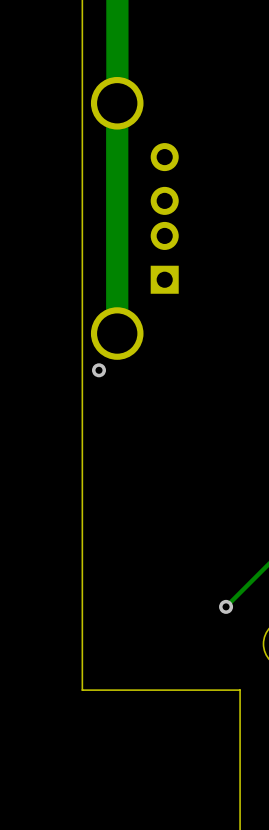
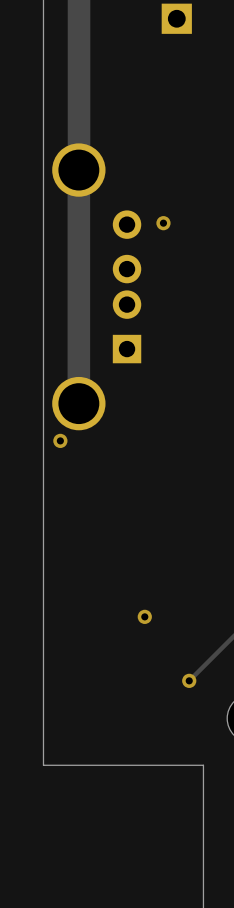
via: none -> (163, 223)
via: none -> (144, 616)

